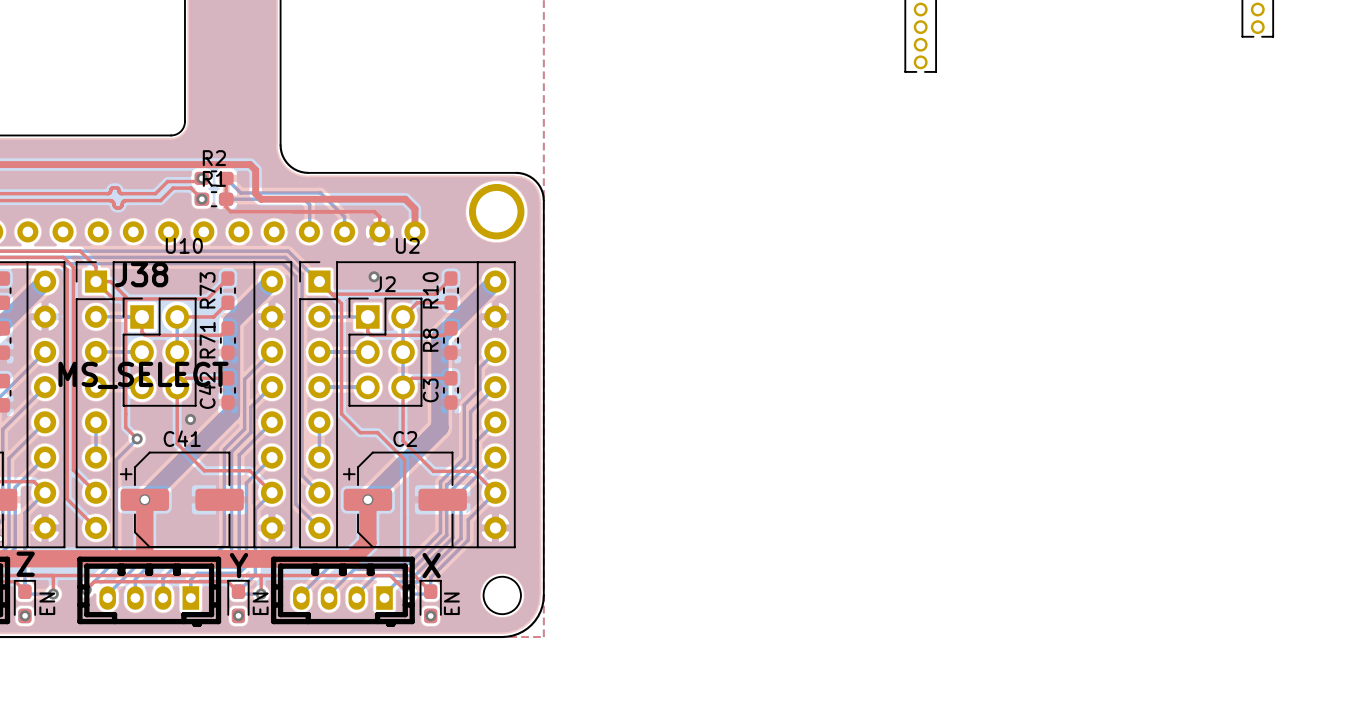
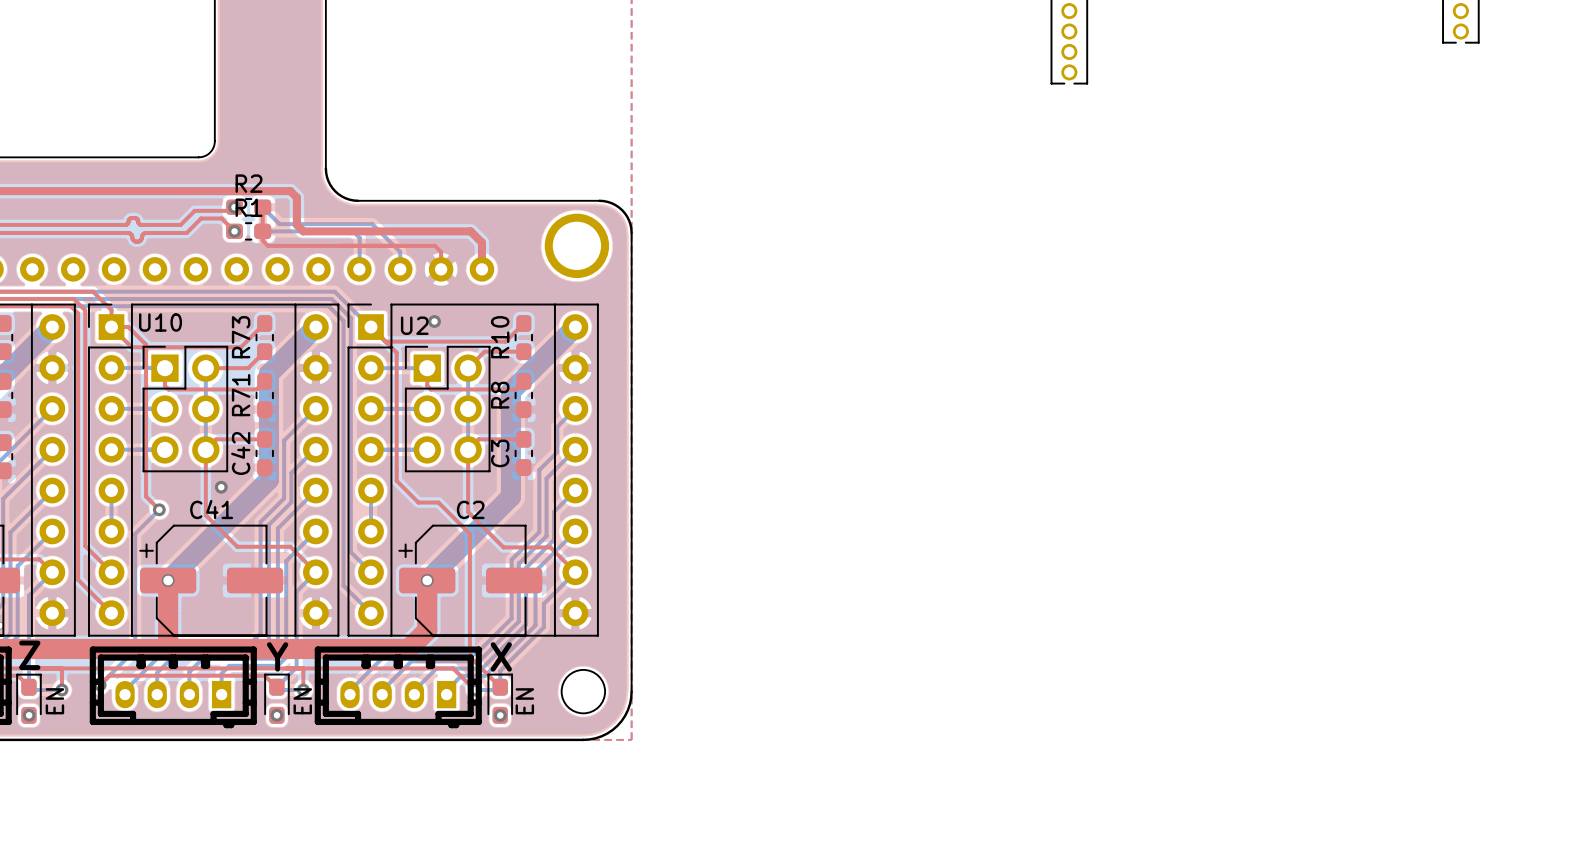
U10 name position: U10 (184, 245) -> U10 (160, 322)
U2 name position: U2 (407, 245) -> U2 (414, 325)
J38 name: J38 (141, 274) -> none
J2 name: J2 (385, 284) -> none
J38 value: MS_SELECT (143, 375) -> none

